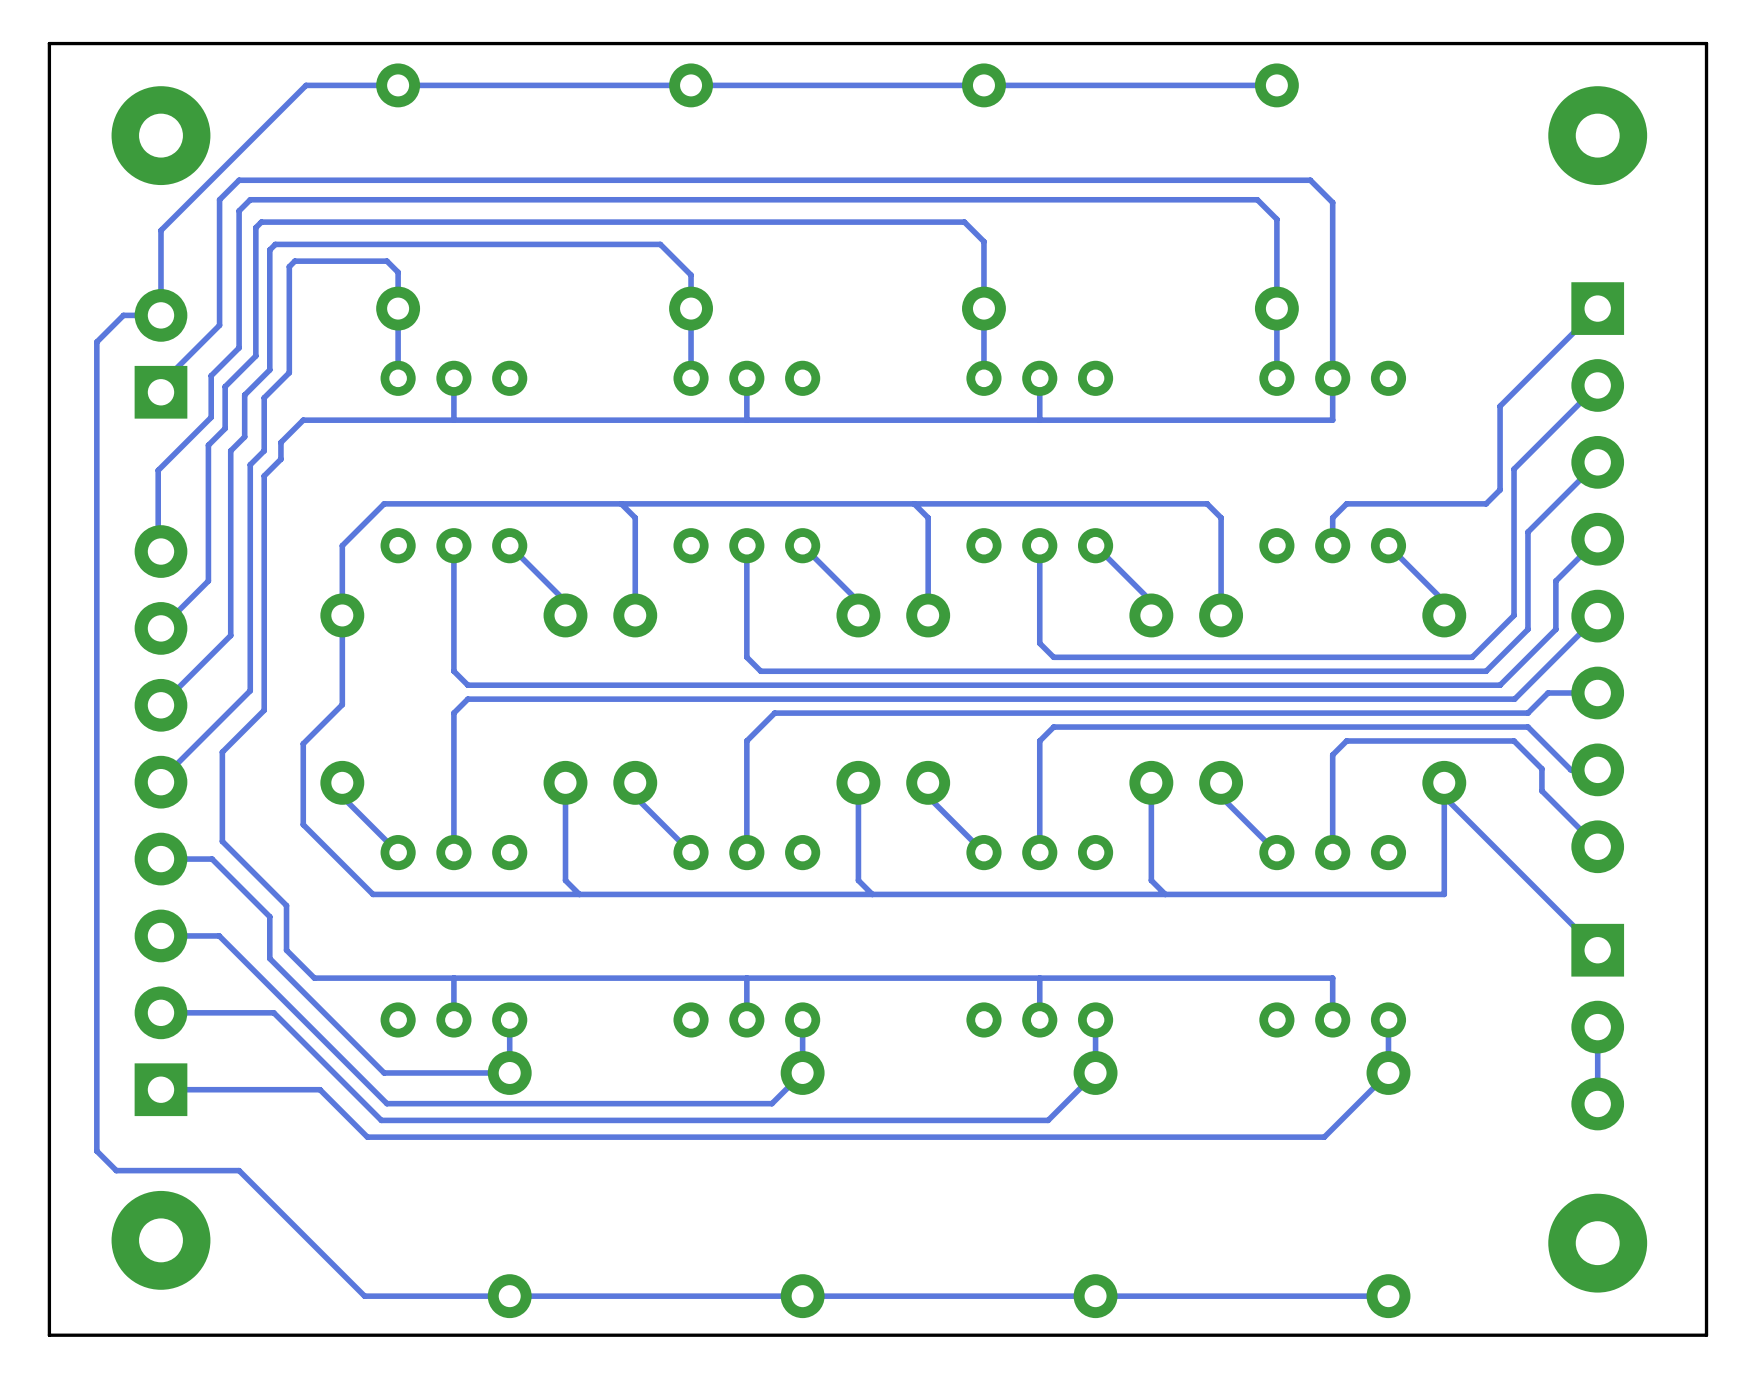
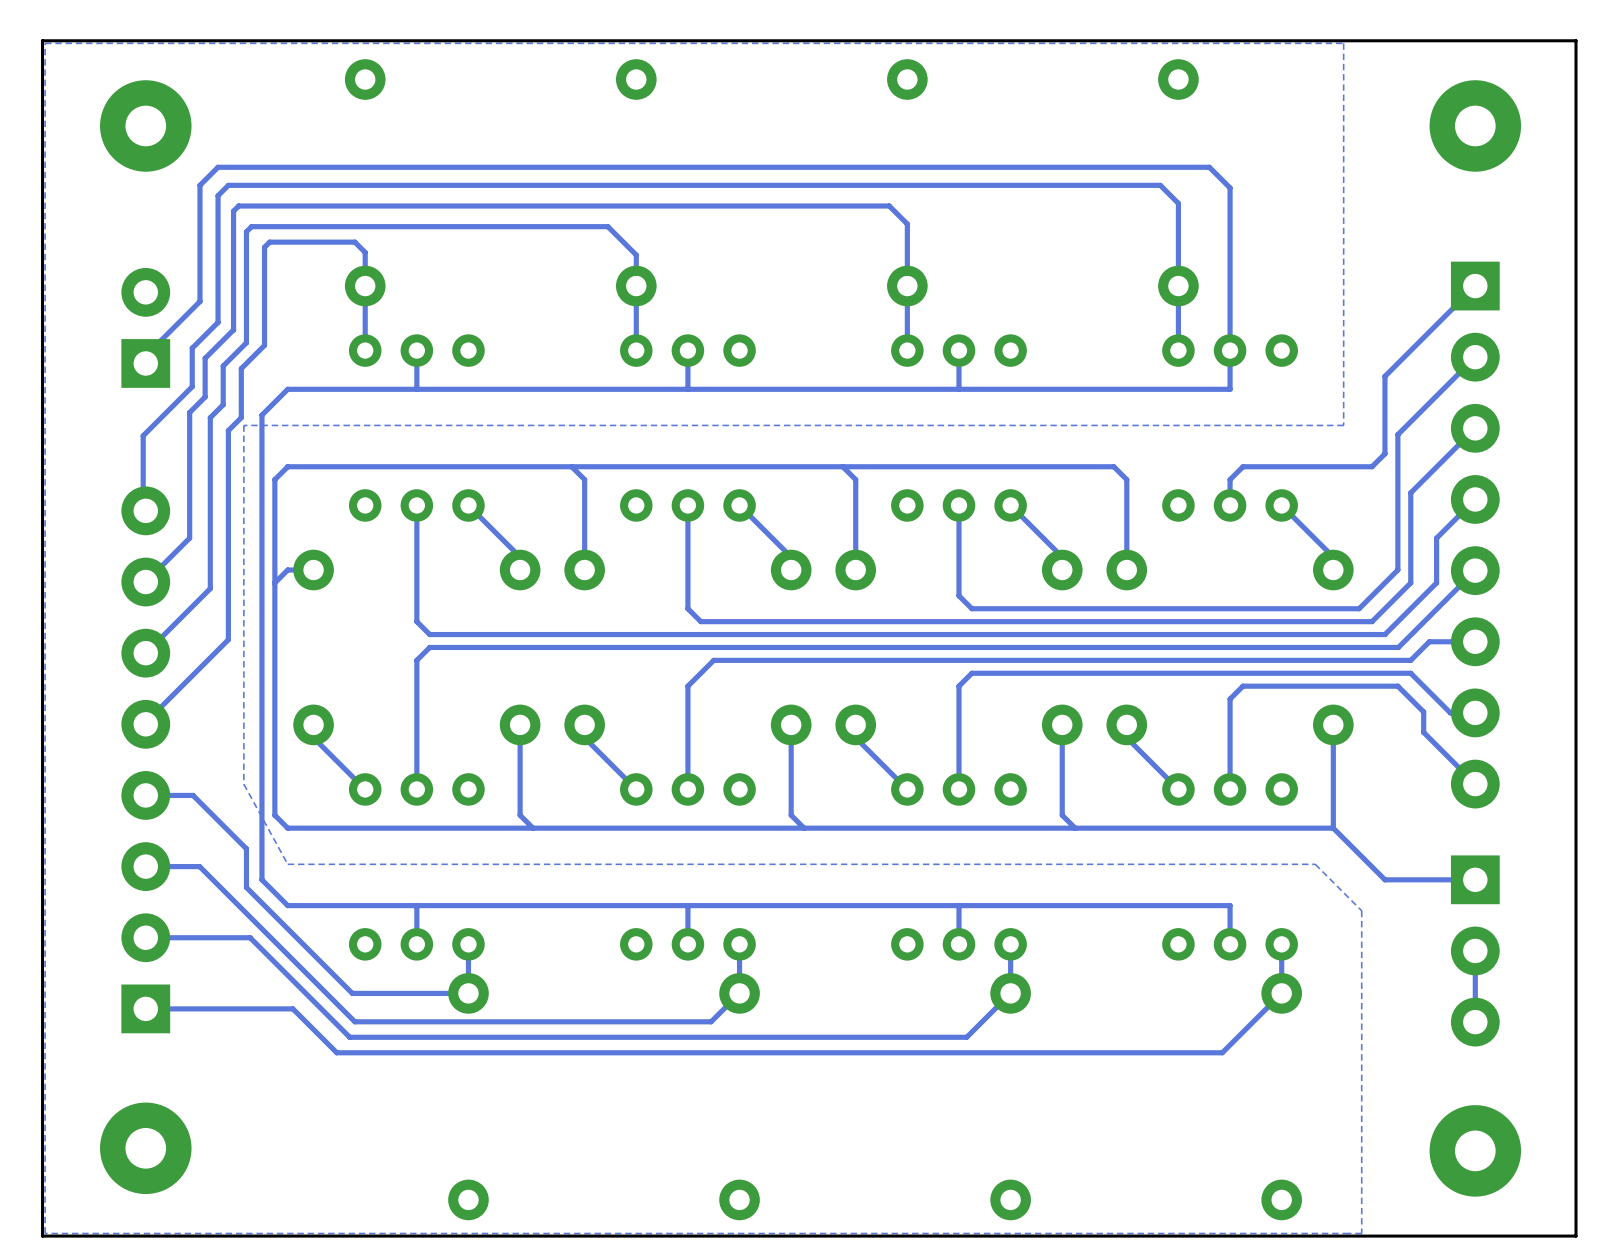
bottom zone outline: none -> (1343, 43) (45, 43) (45, 1233) (1361, 1233) (1361, 910) (1315, 864) (287, 864) (243, 784) (243, 425) (1343, 425) (1343, 43)
bottom track: (1276, 85) (306, 85) (160, 230) (160, 315) (123, 315) (96, 342) (96, 1151) (116, 1170) (239, 1170) (364, 1296) (1388, 1296) -> none
bottom track: (314, 420) (303, 420) (280, 442) (280, 459) (264, 475) (264, 710) (222, 752) (222, 841) (286, 905) -> (287, 389) (261, 415) (261, 838)
bottom track: (384, 503) (342, 545) (342, 704) (303, 743) (303, 824) (373, 894) -> (352, 466) (287, 466) (274, 479) (274, 815) (287, 828) (341, 828)
bottom track: none -> (313, 570) (287, 570) (274, 582)
bottom track: (1444, 796) (1597, 950) -> (1333, 828) (1384, 879) (1475, 879)

